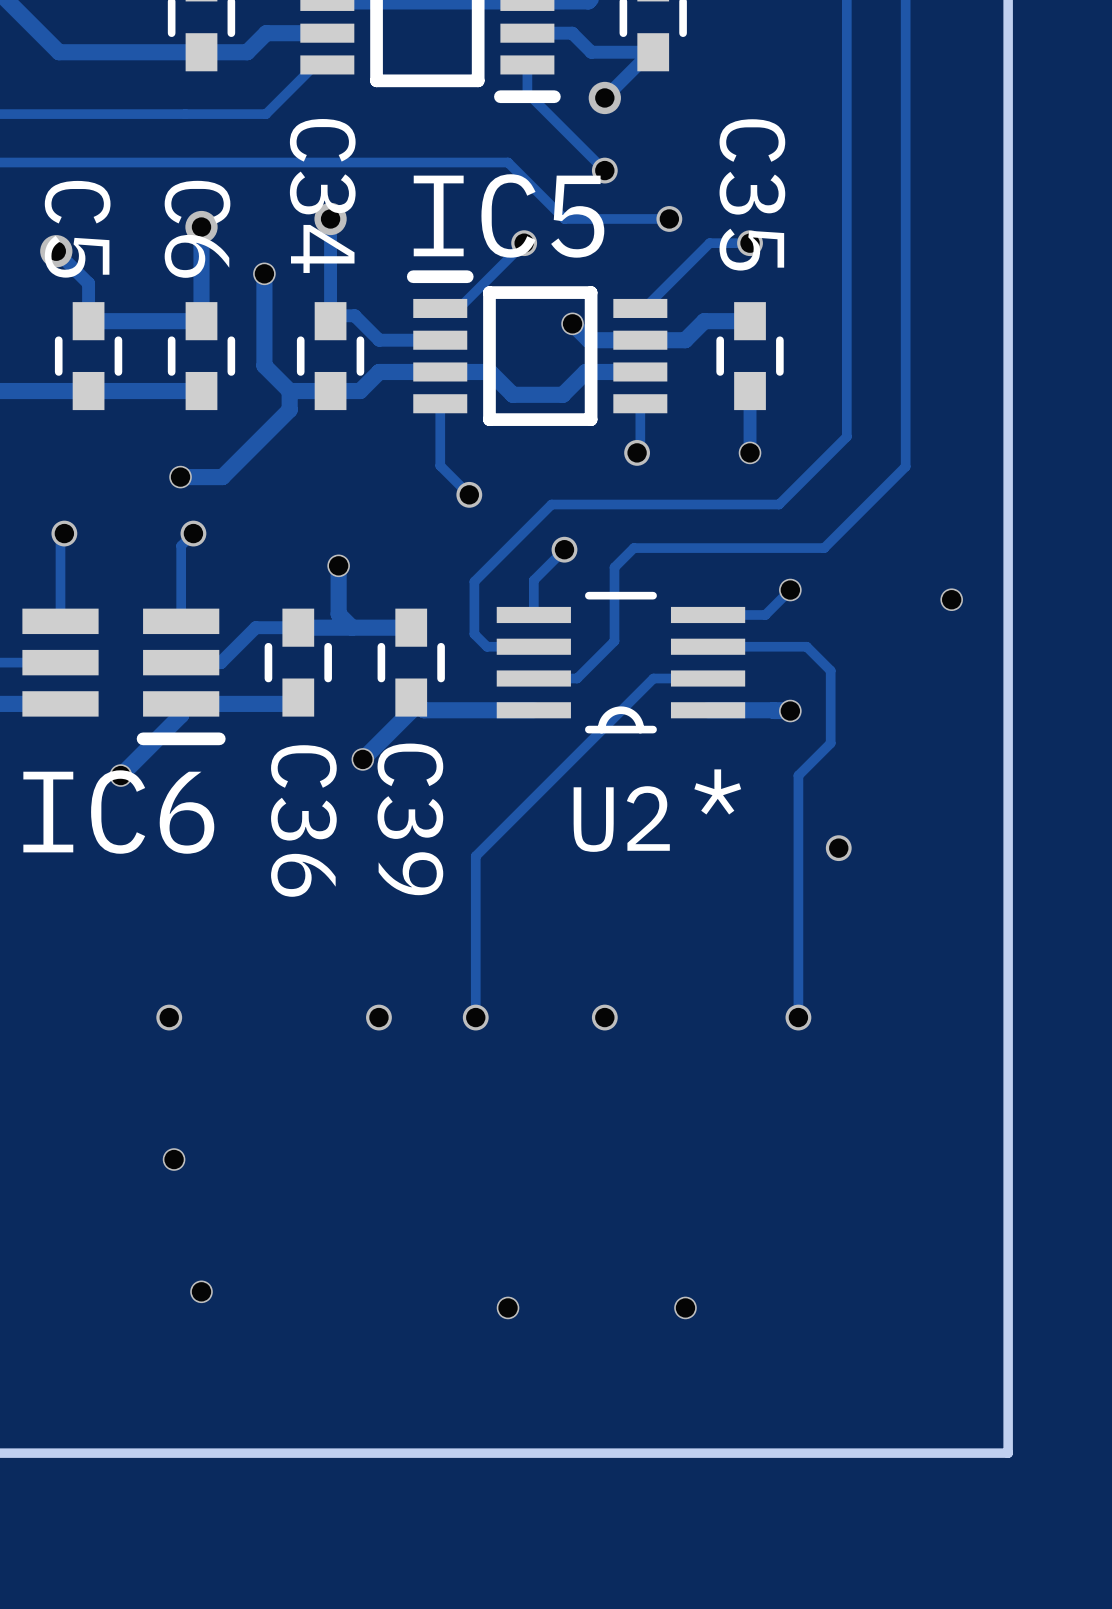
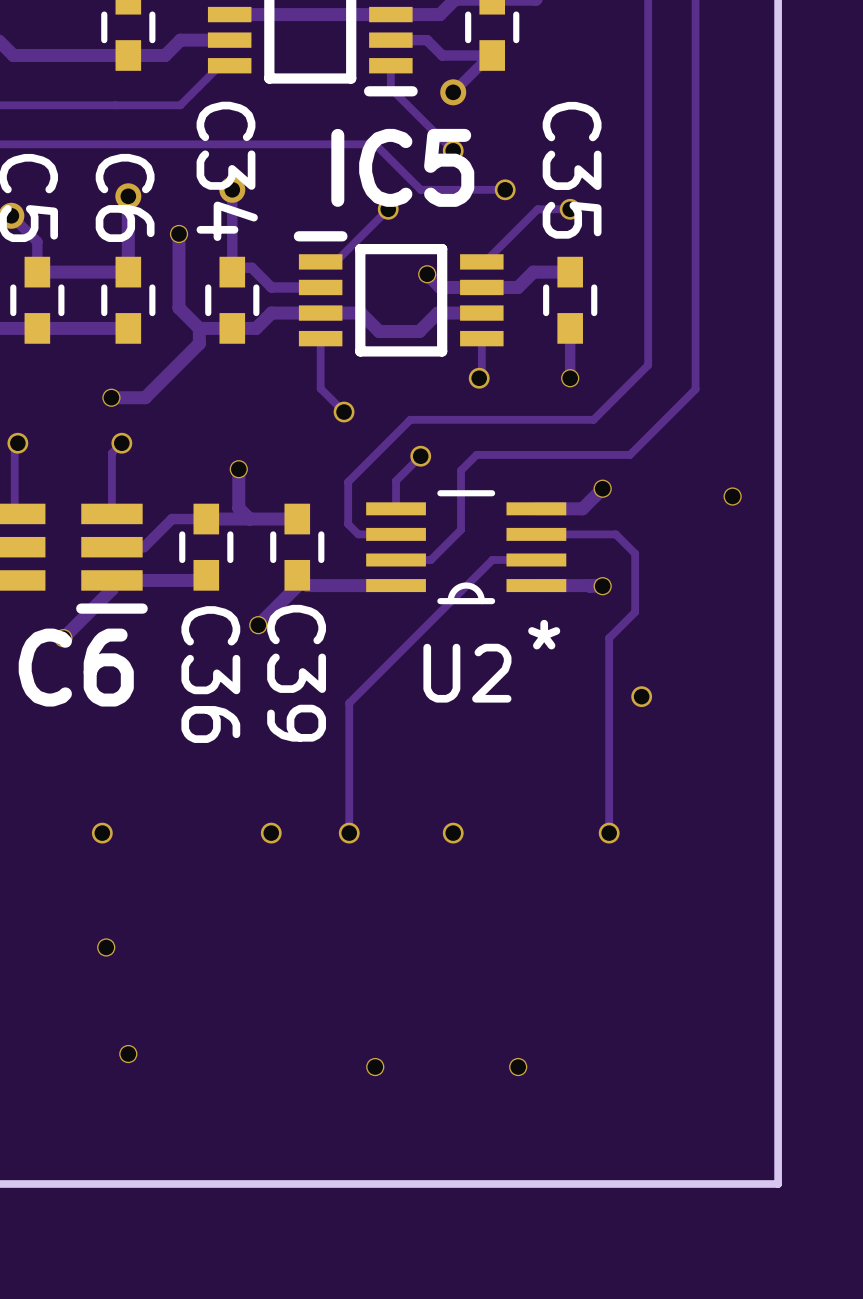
IC5 name position: IC5 (509, 215) -> IC5 (402, 167)
track width: thin (790, 590) (765, 614) (708, 614) -> thick (602, 488) (582, 508) (536, 508)

